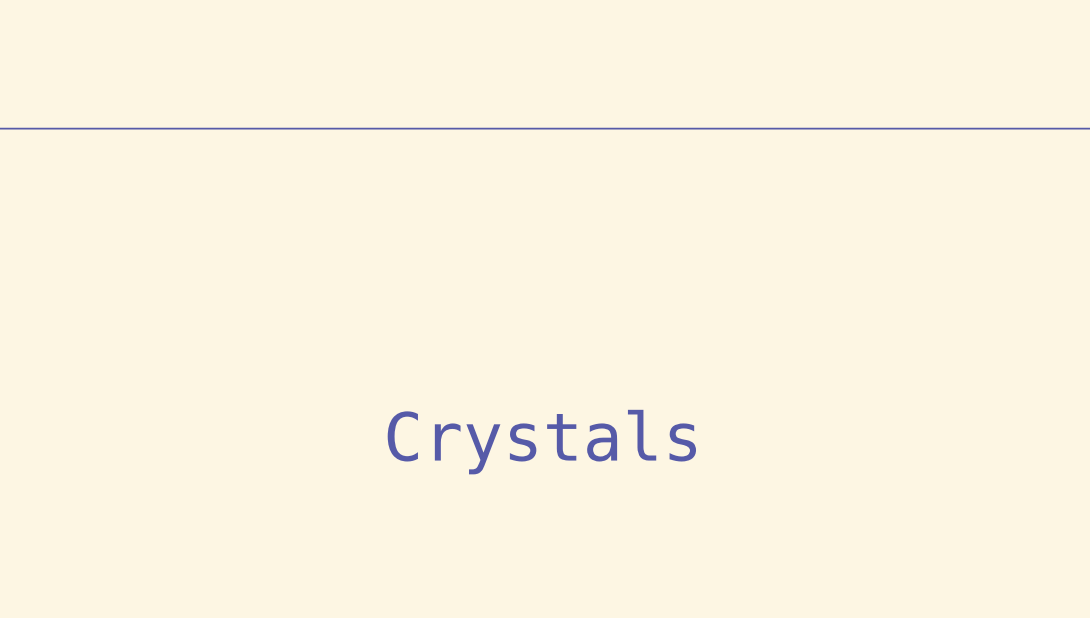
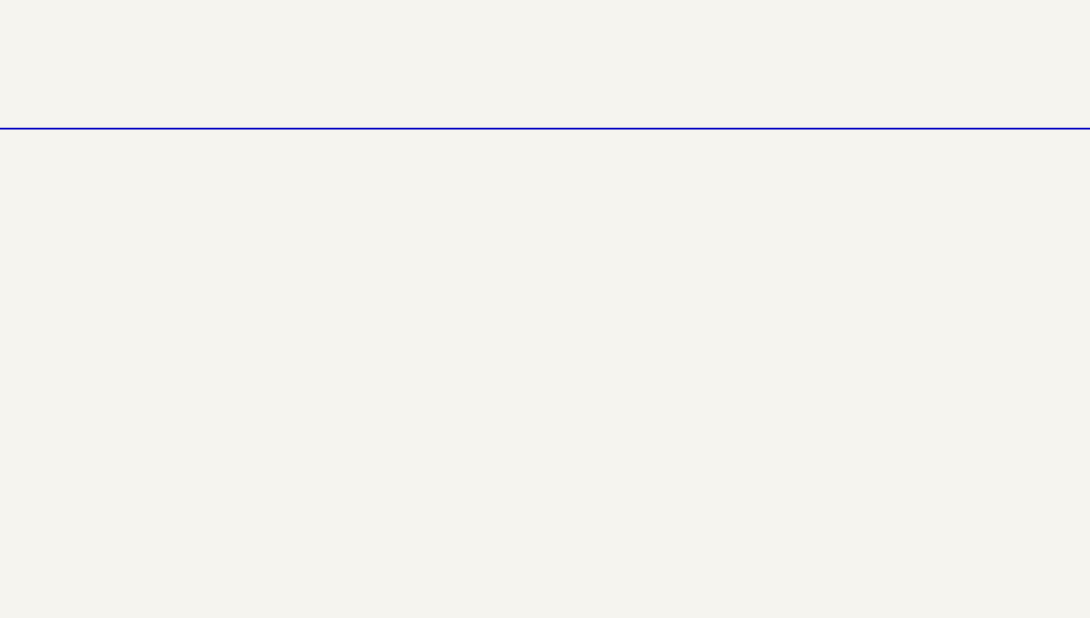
text: Crystals (541, 442) -> none

